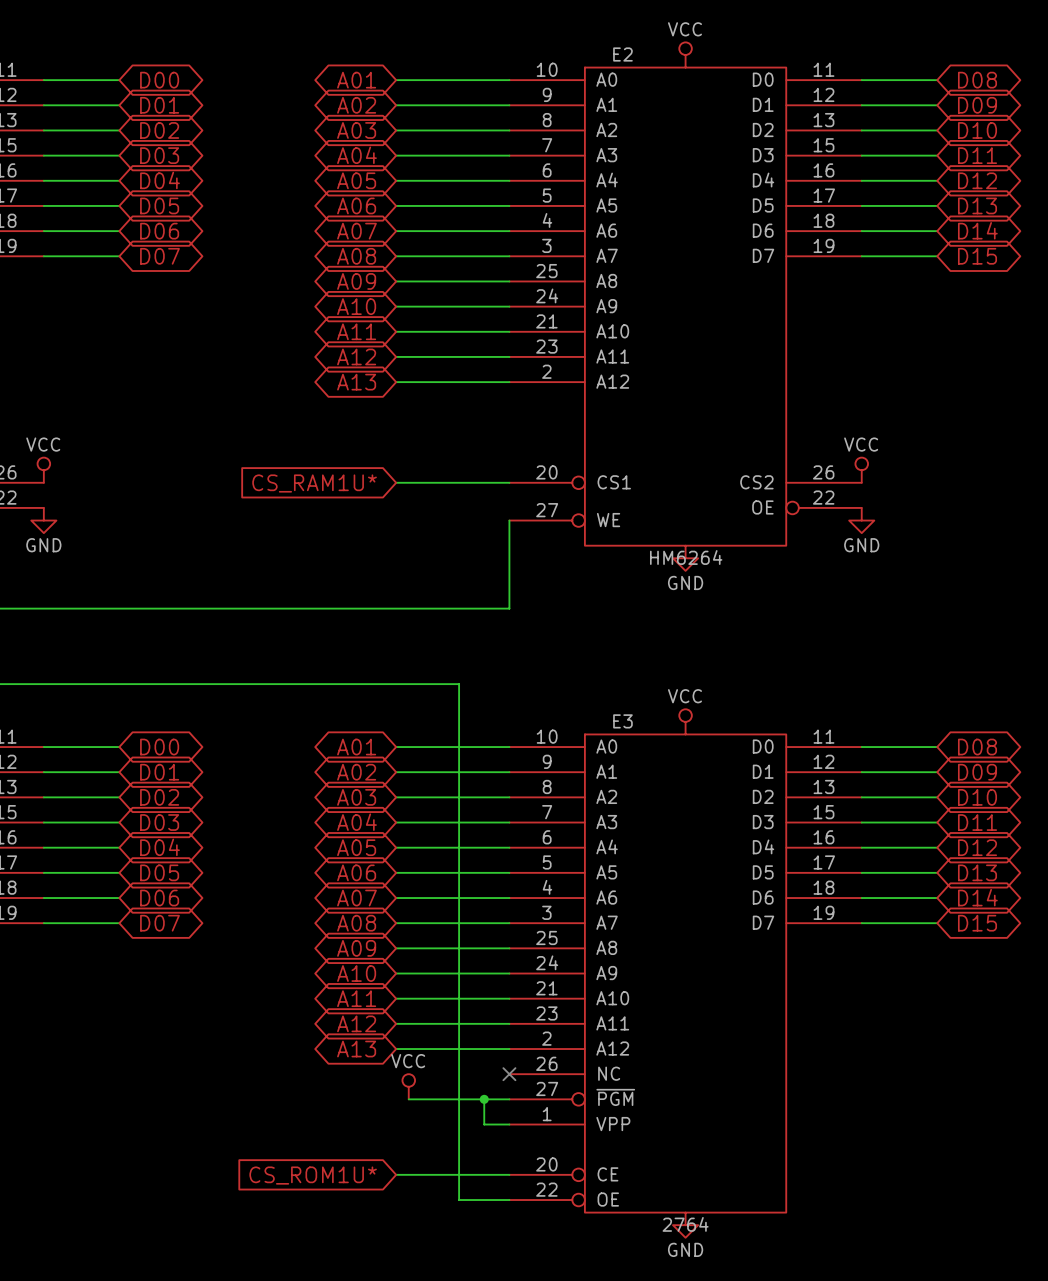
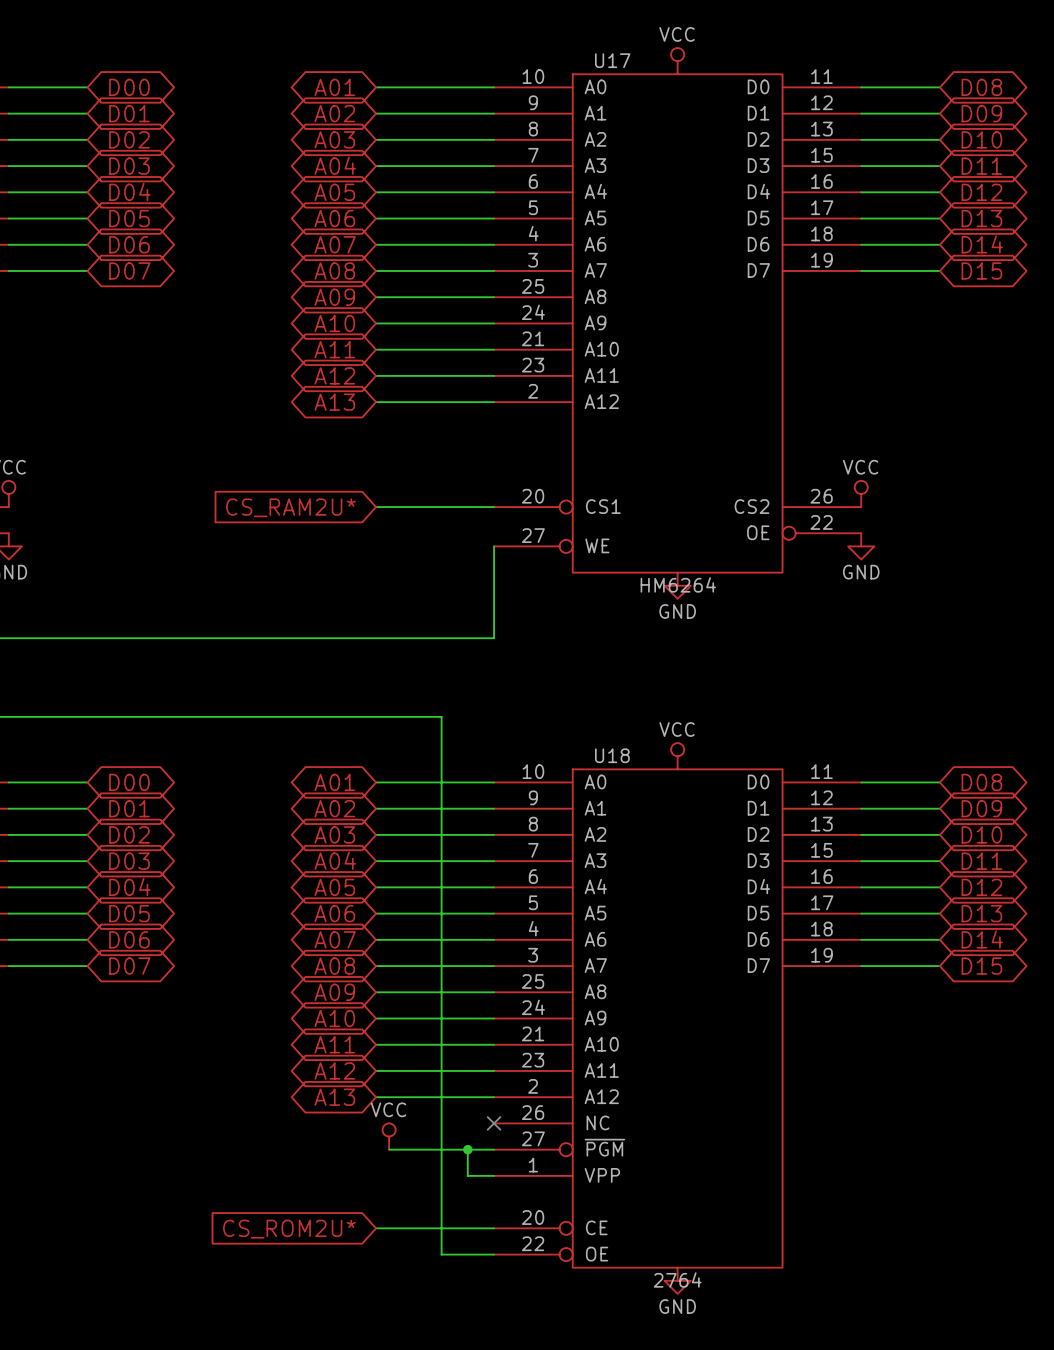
E2 name: E2 (622, 54) -> U17 (612, 60)
global label: CS_RAM1U* (314, 483) -> CS_RAM2U* (290, 507)
E3 name: E3 (622, 721) -> U18 (612, 755)
global label: CS_ROM1U* (313, 1175) -> CS_ROM2U* (289, 1229)

